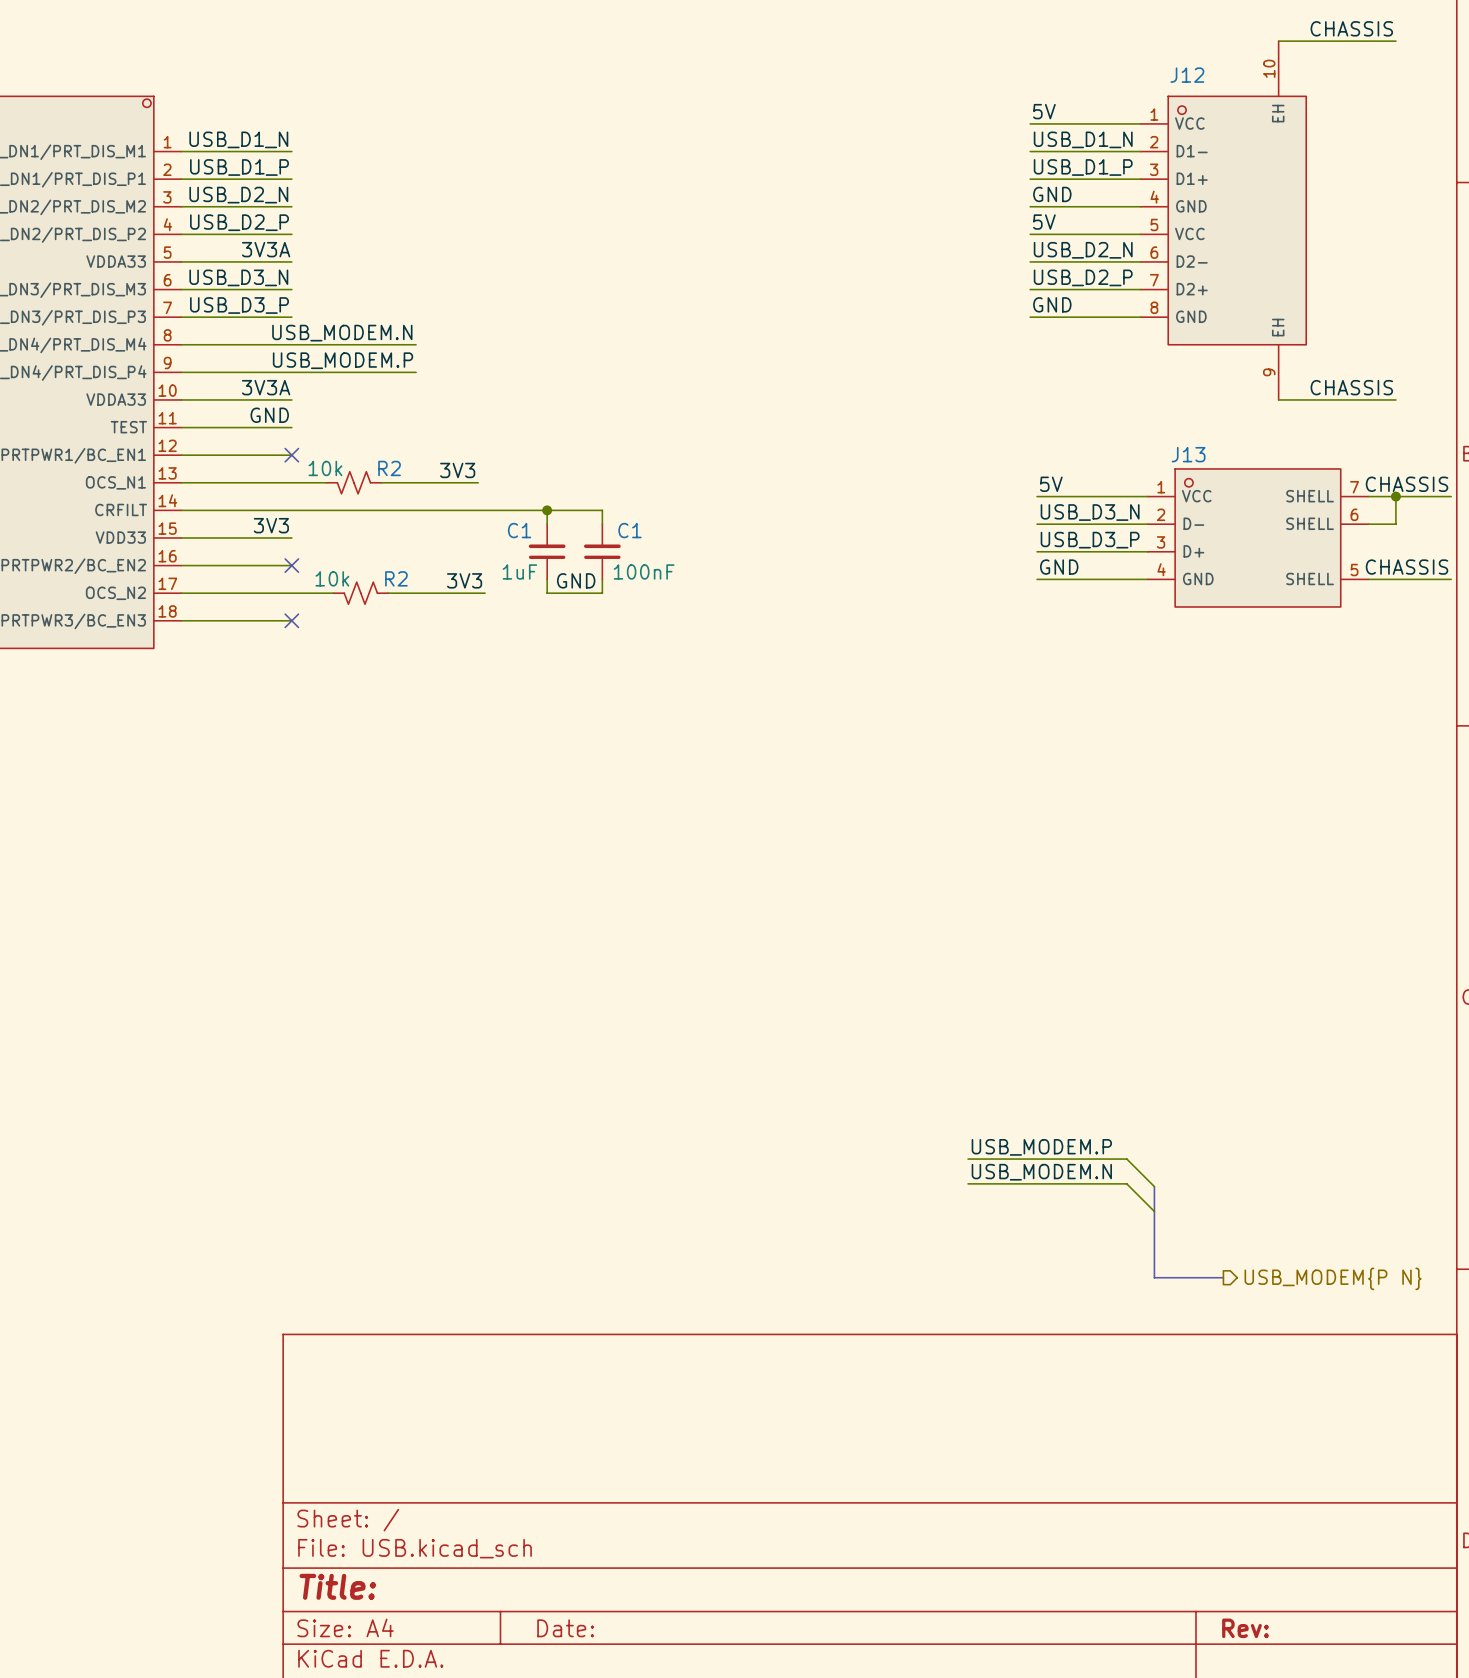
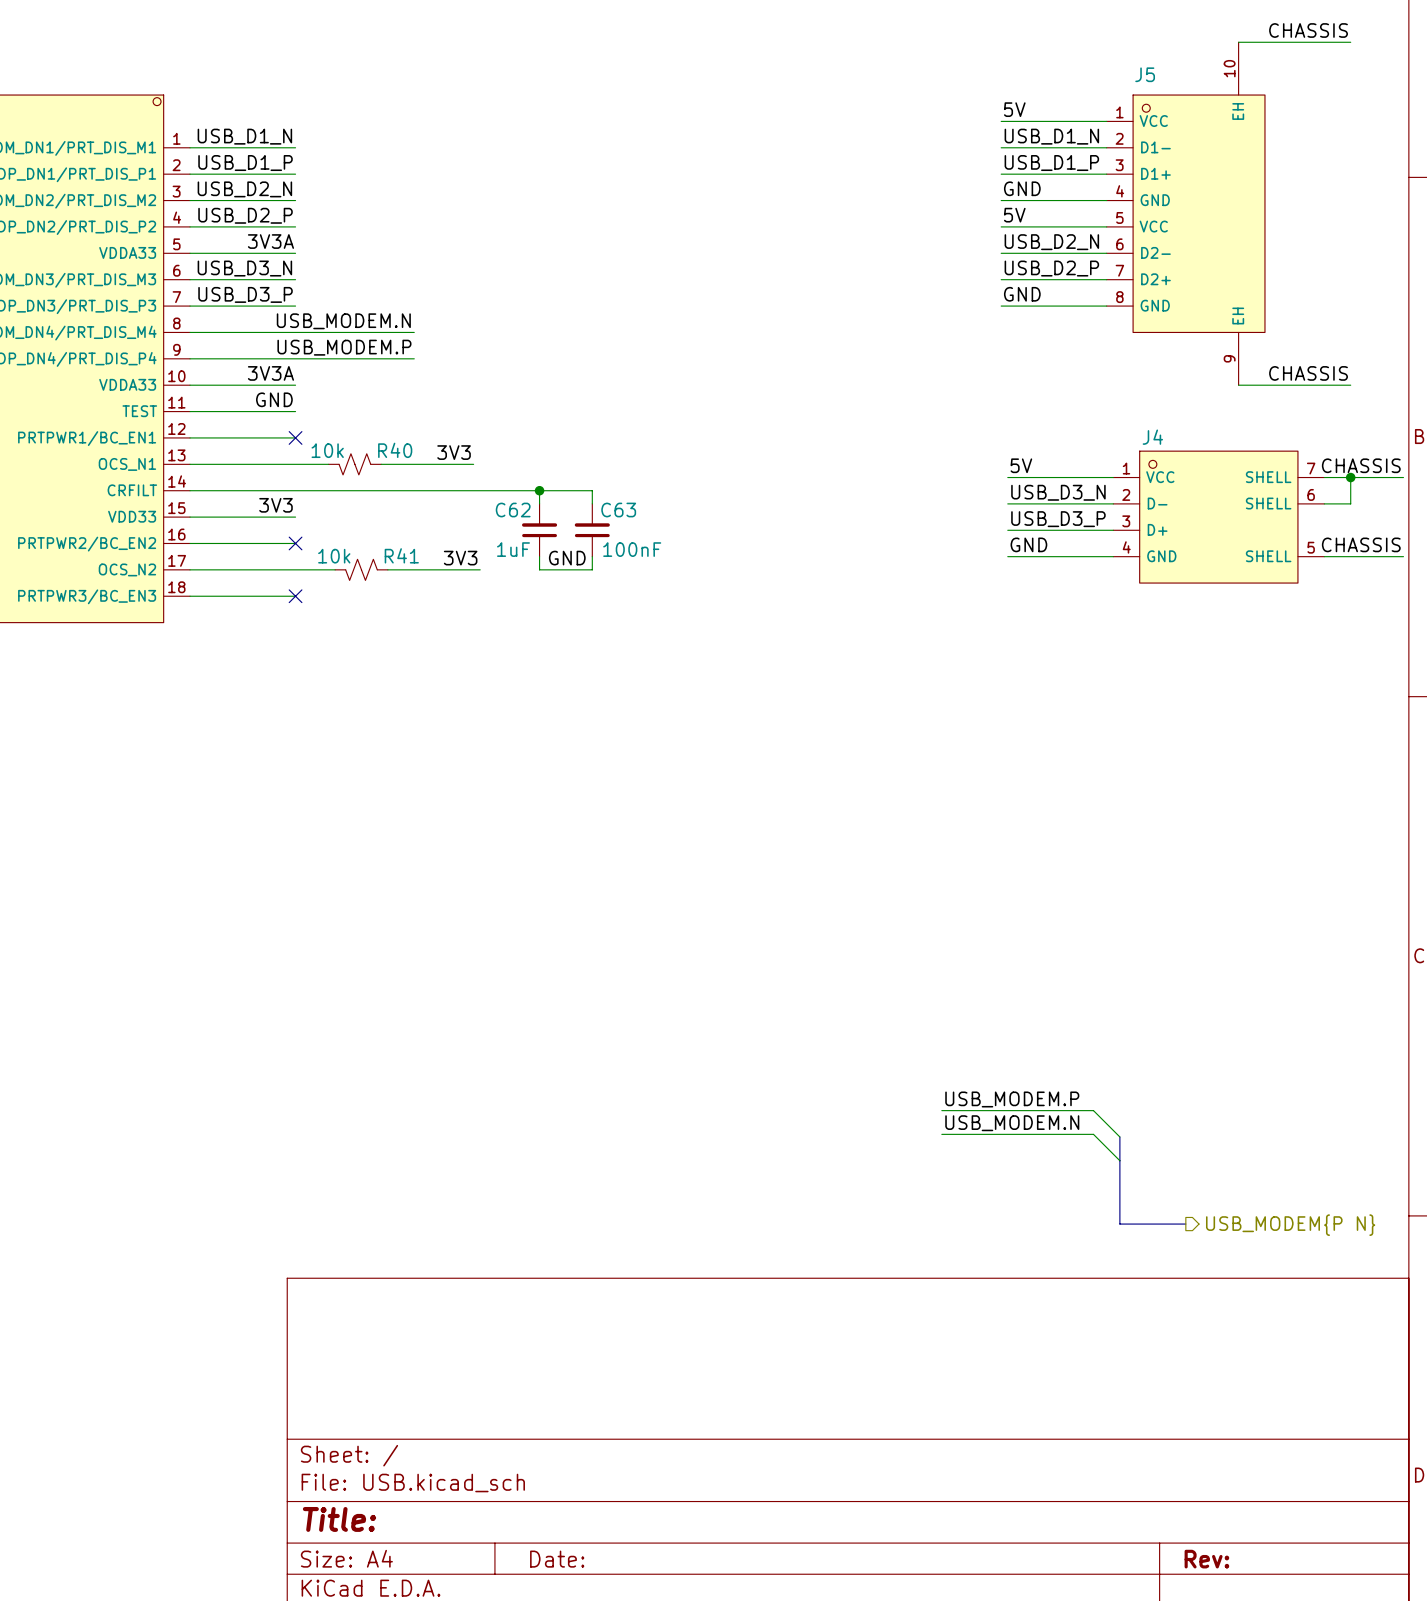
J12 name: J12 (1187, 75) -> J5 (1145, 74)
J13 name: J13 (1188, 454) -> J4 (1152, 437)
R2 name: R2 (389, 468) -> R40 (395, 450)
C1 name: C1 (519, 530) -> C62 (513, 510)
C1 name: C1 (629, 530) -> C63 (618, 510)
R2 name: R2 (396, 578) -> R41 (401, 555)

